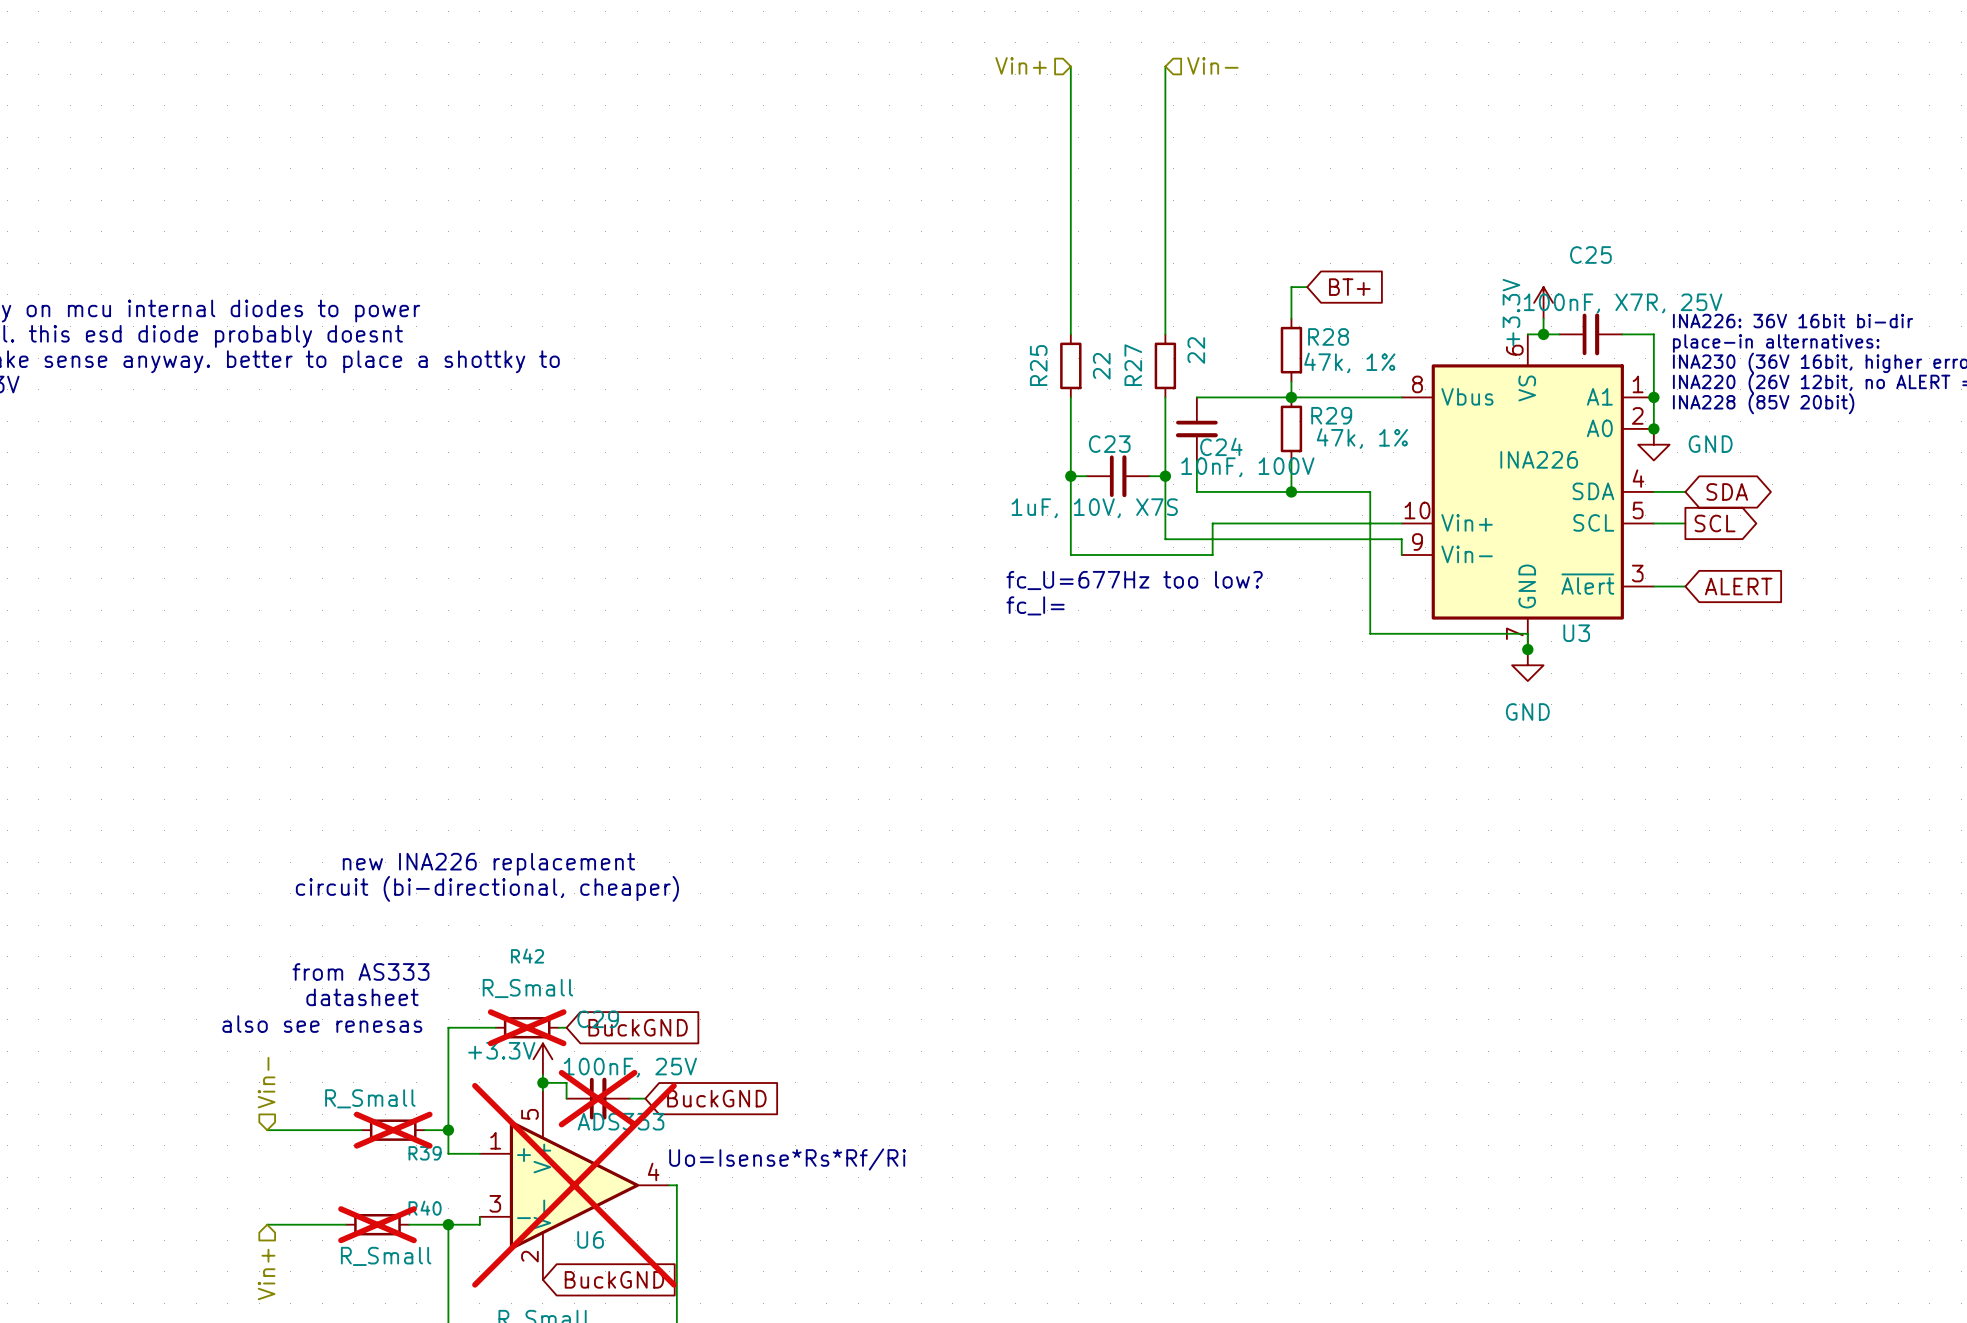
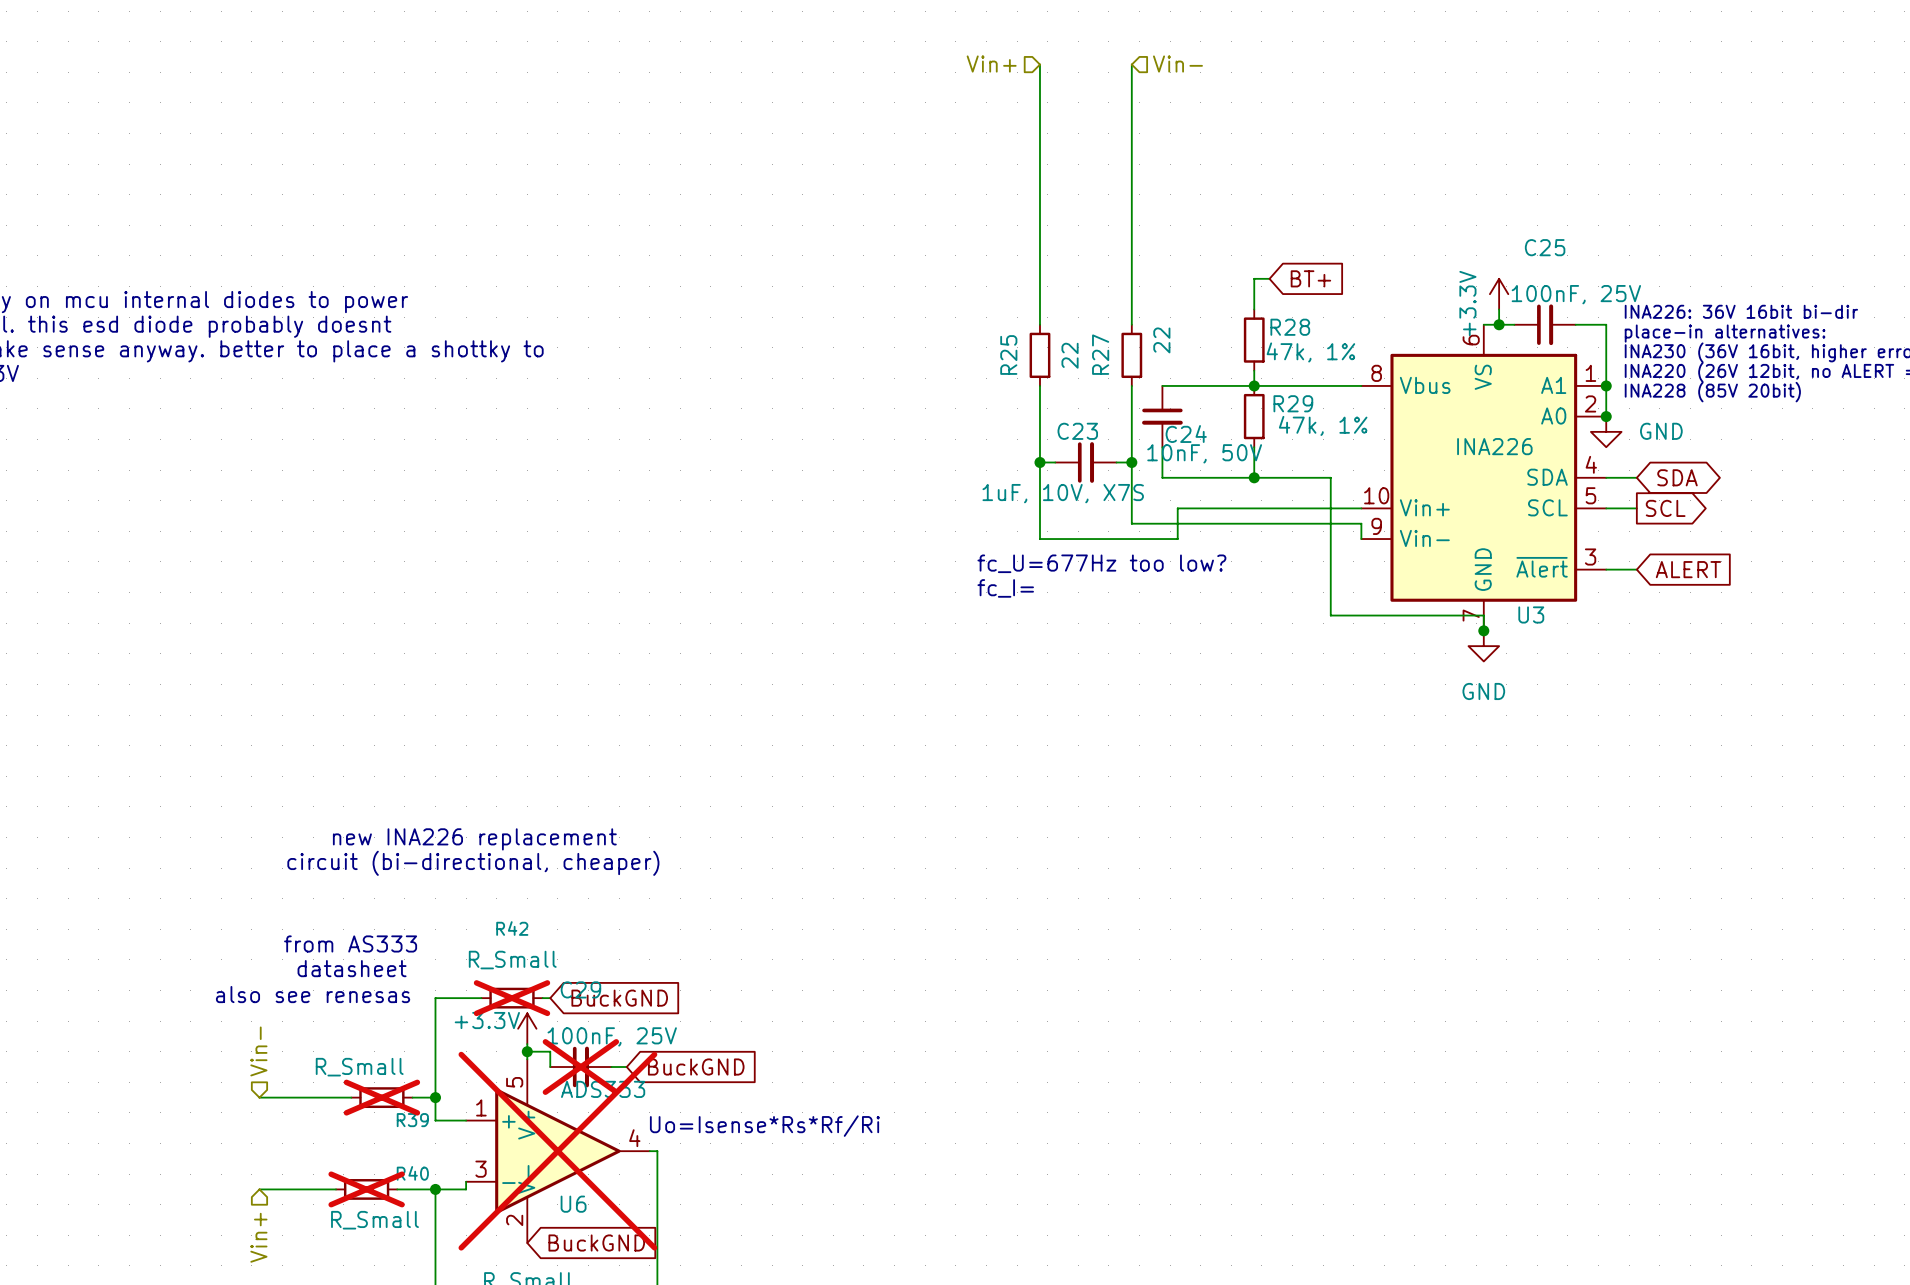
C25 value: 100nF, X7R, 25V (1623, 303) -> 100nF, 25V (1576, 294)
C24 value: 10nF, 100V (1247, 467) -> 10nF, 50V (1204, 453)

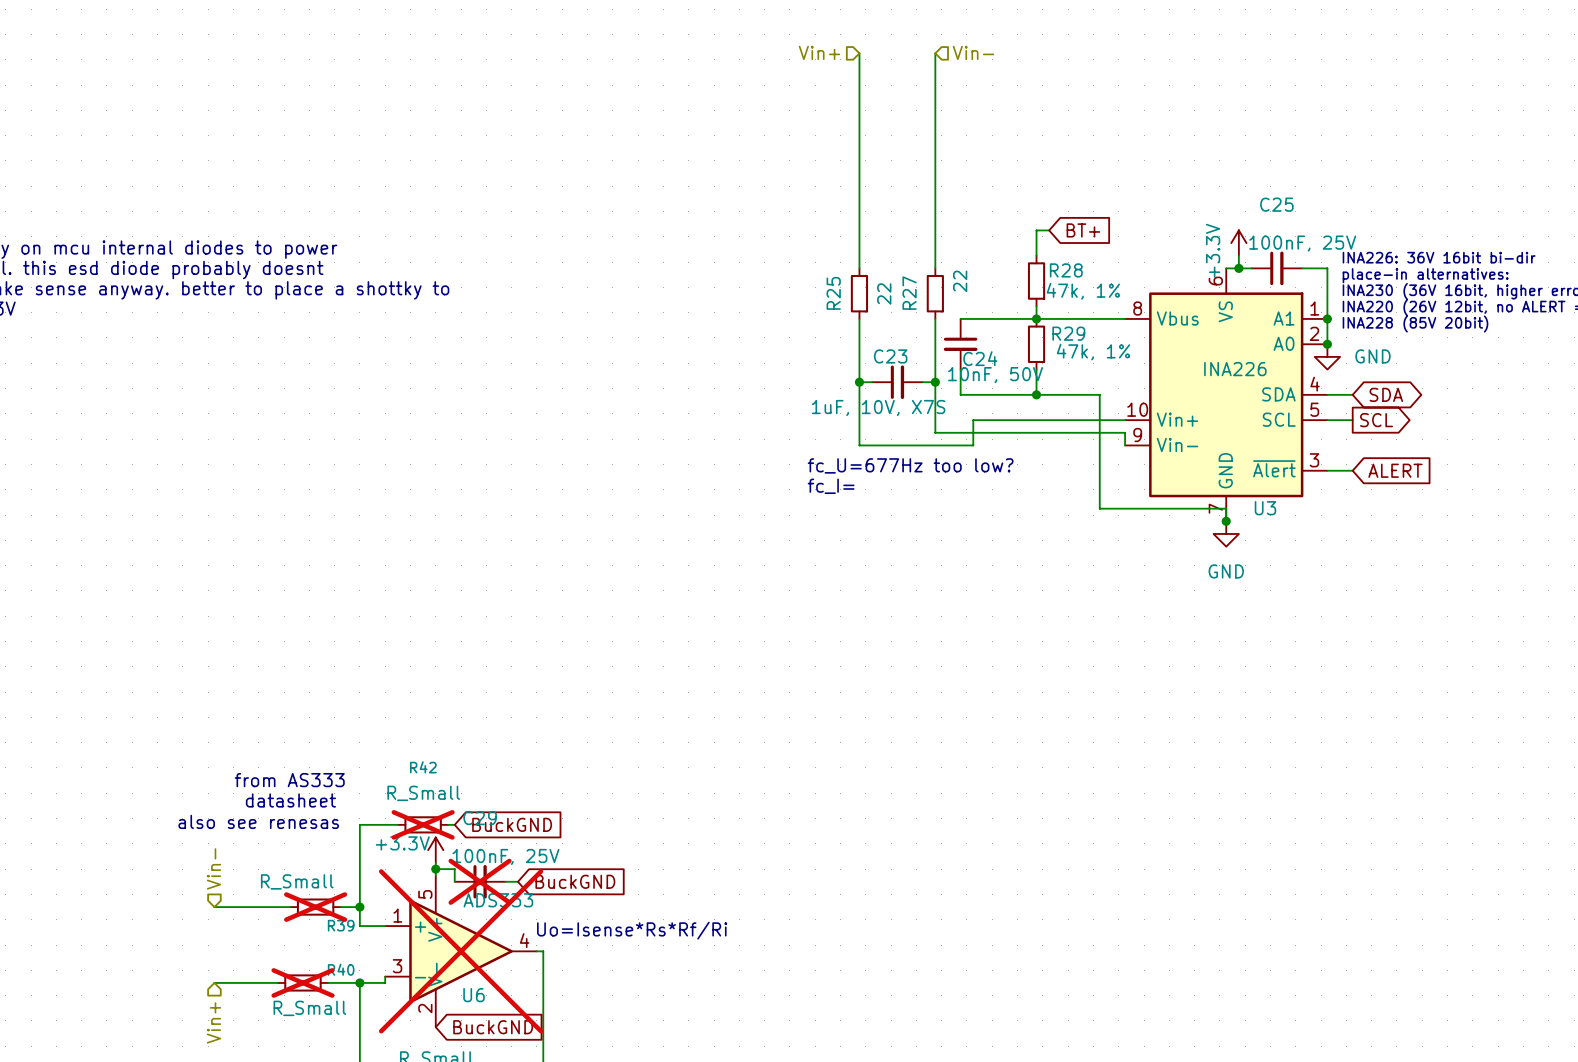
text: new INA226 replacement (474, 839) -> none
text: circuit (bi-directional, cheaper) (473, 863) -> none

